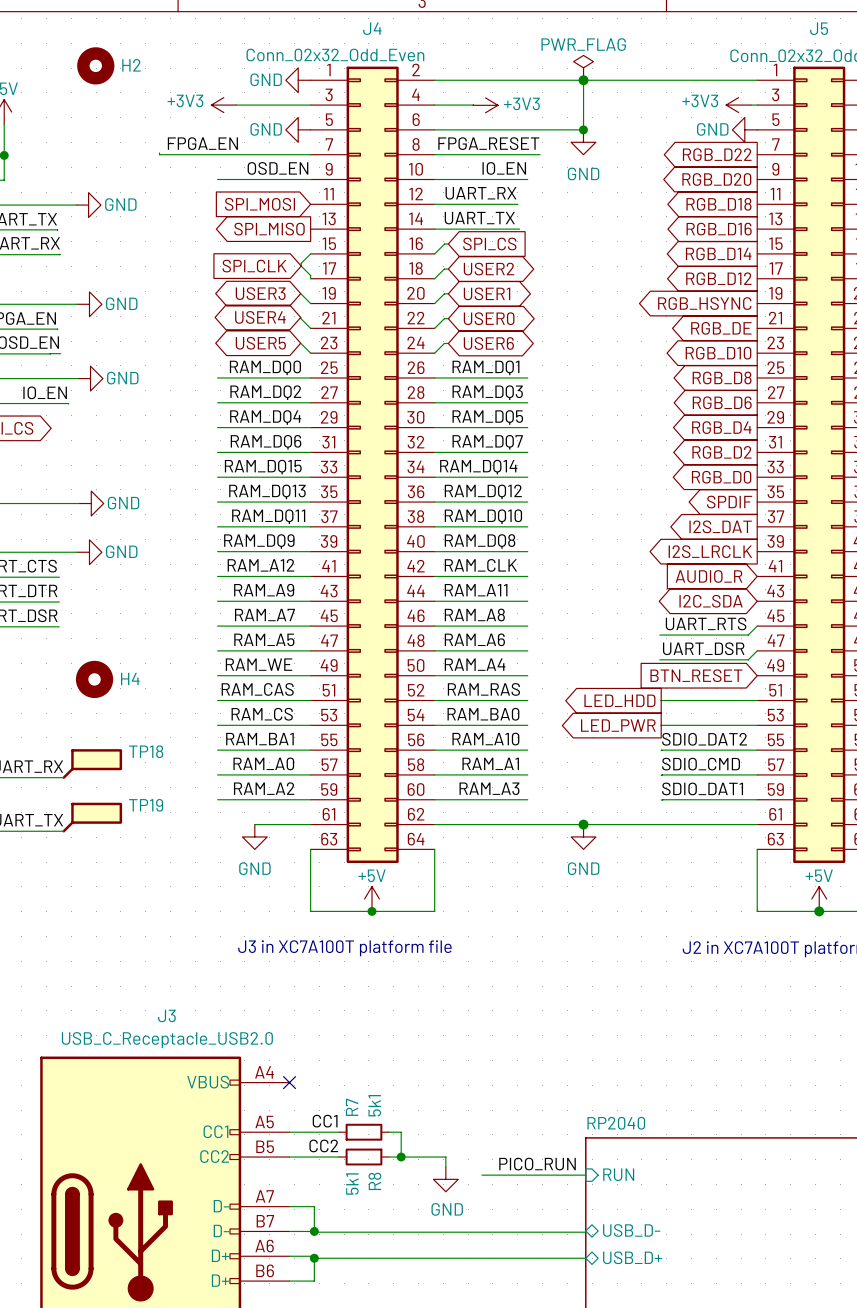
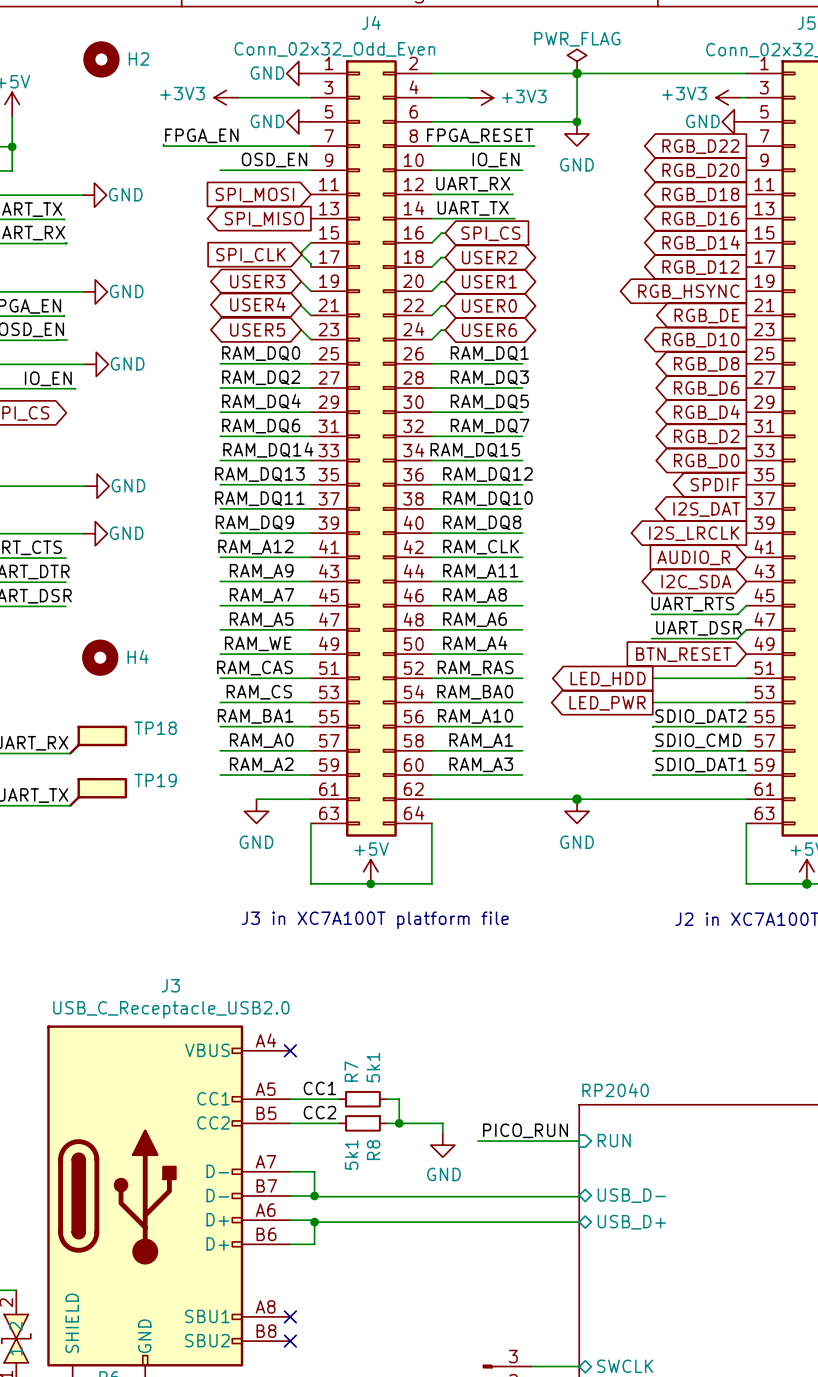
label position: RAM_DQ15 (263, 467) -> RAM_DQ15 (475, 450)
label position: RAM_DQ14 (478, 467) -> RAM_DQ14 (268, 450)

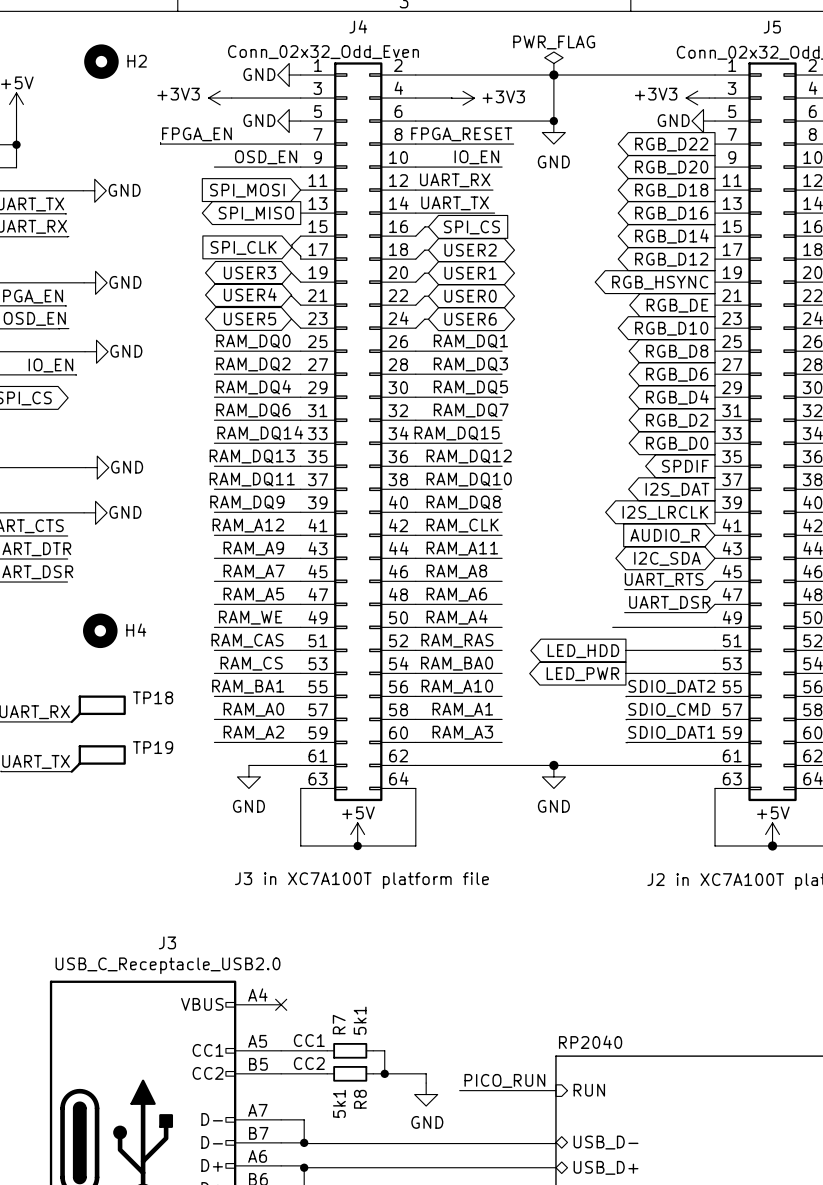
wire: none -> (612, 627) (715, 627)
global label: BTN_RESET (683, 654) -> none

